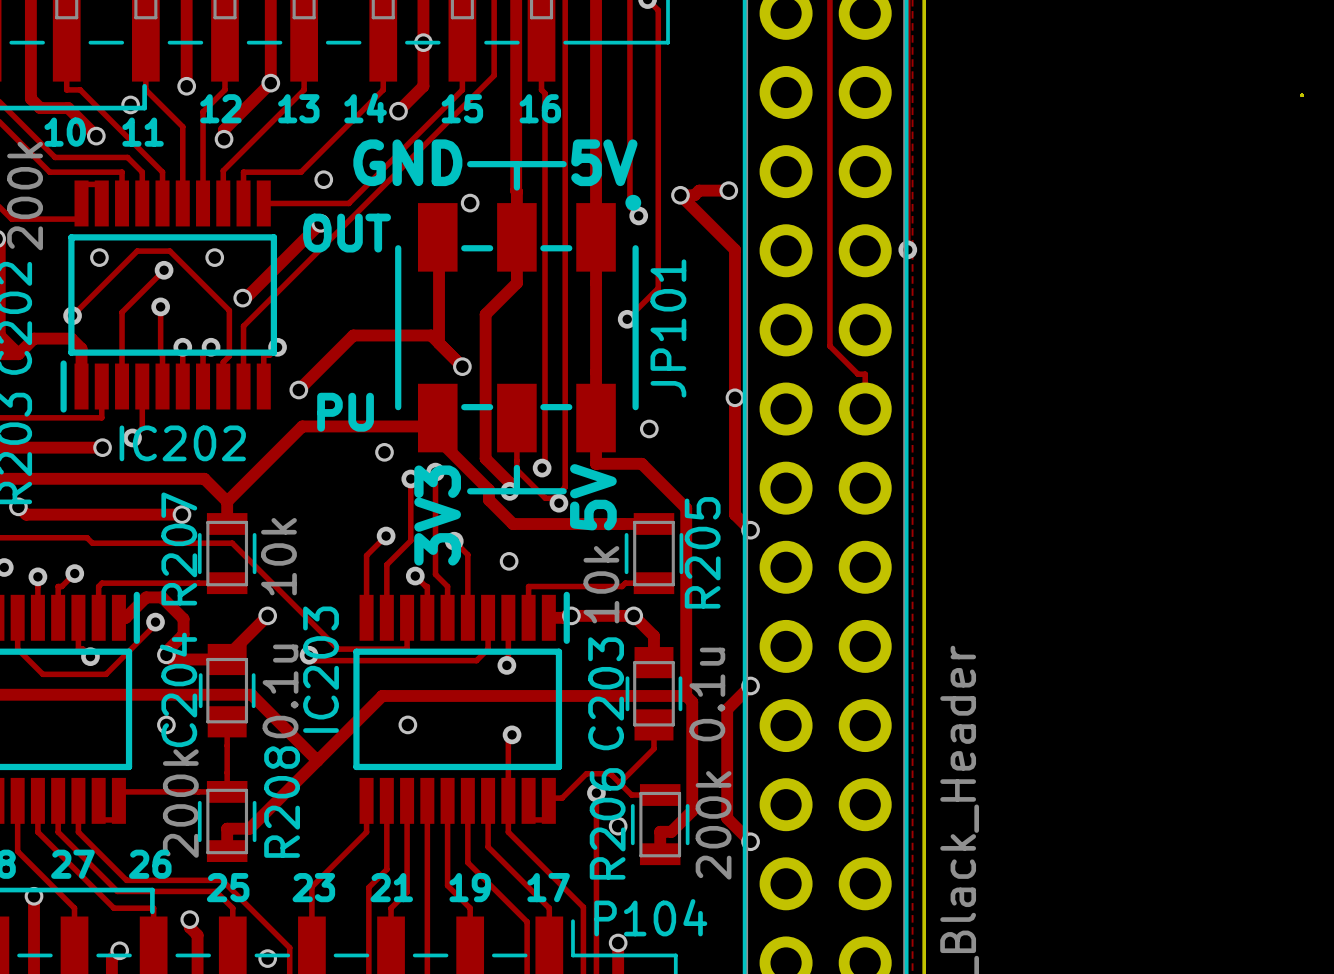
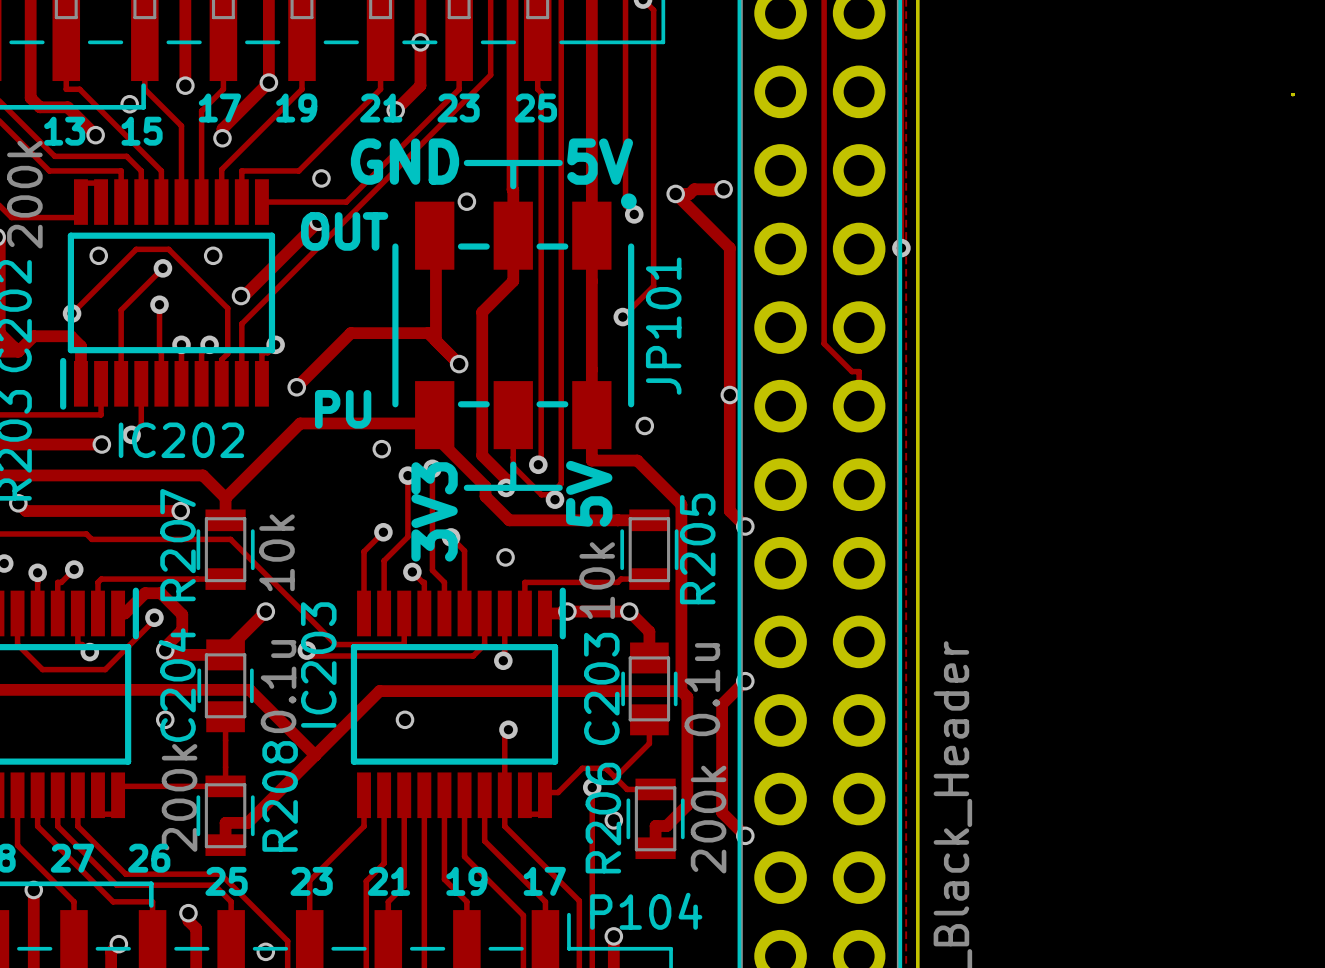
text: 12 (220, 108) -> 17 (219, 107)
text: 13 (298, 108) -> 19 (296, 107)
text: 14 (365, 108) -> 21 (381, 107)
text: 15 (462, 108) -> 23 (458, 107)
text: 16 (540, 108) -> 25 (535, 107)
text: 10 (65, 132) -> 13 (64, 131)
text: 11 (143, 132) -> 15 (142, 131)

